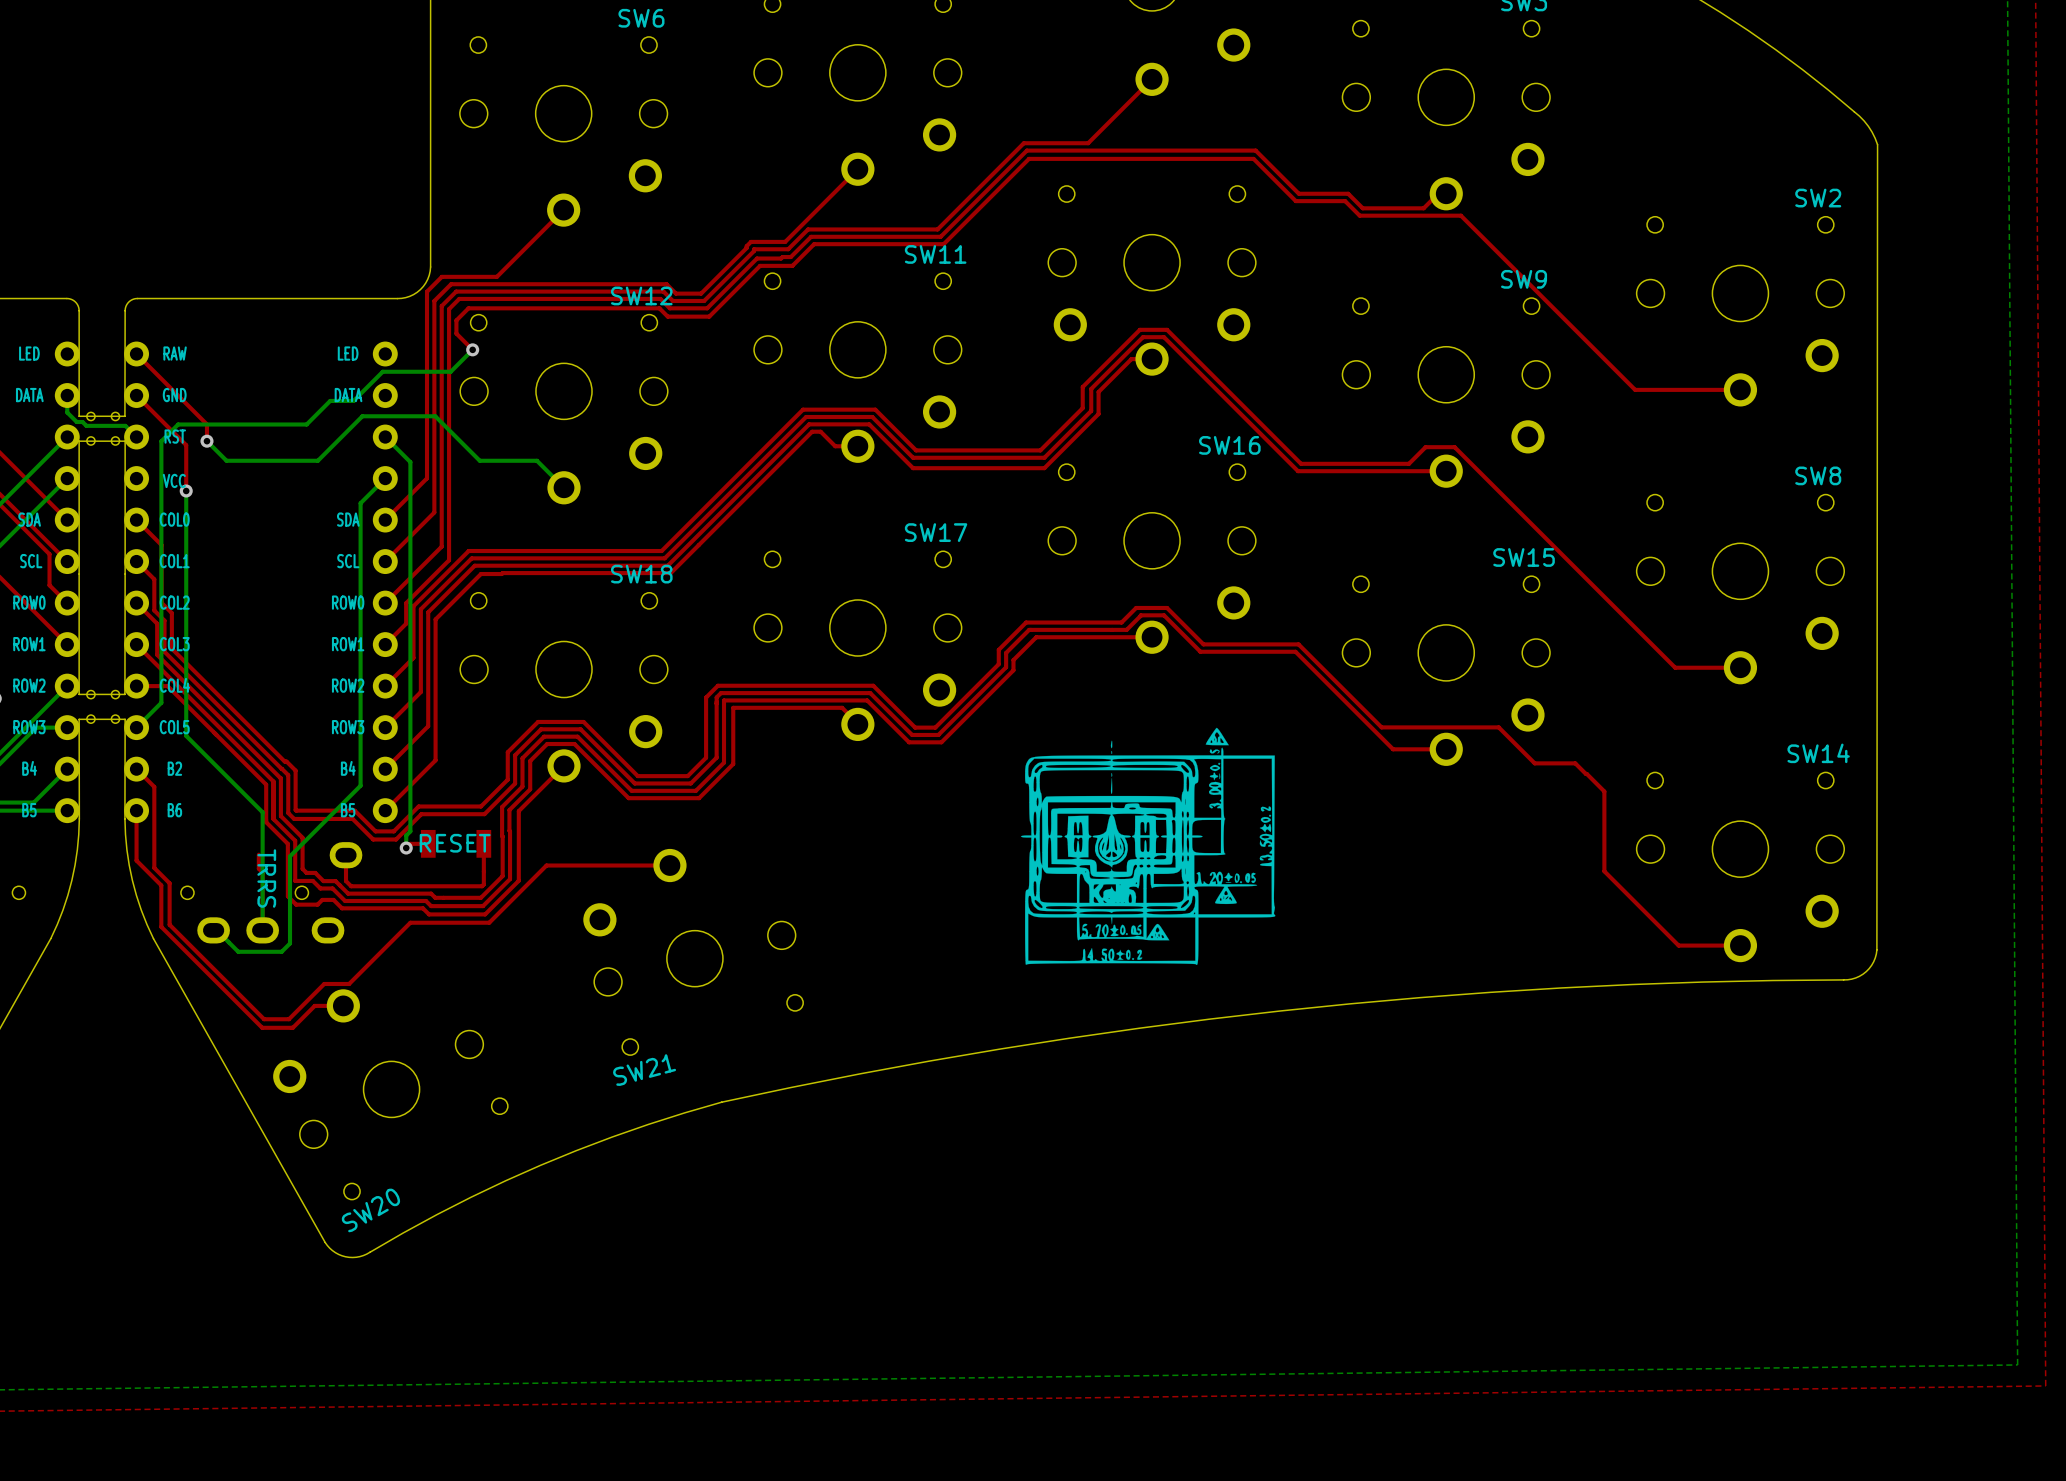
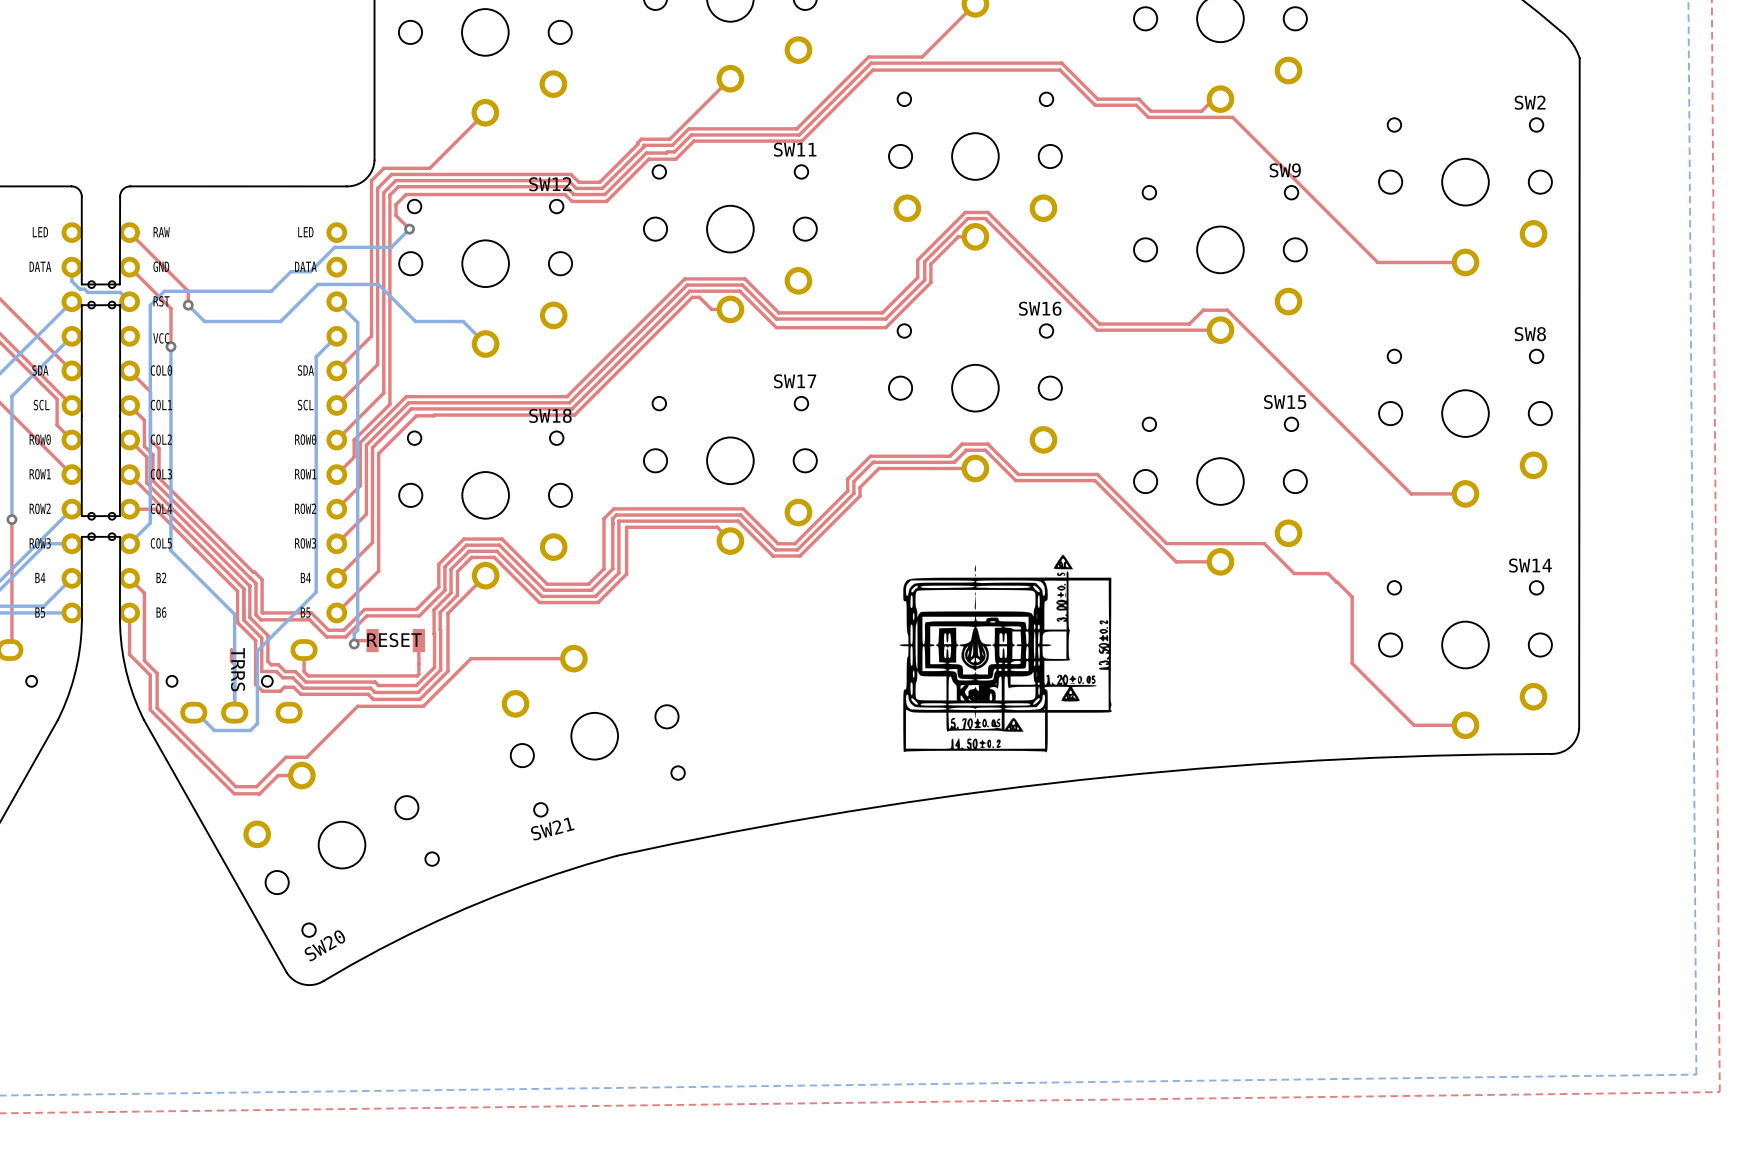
drawing position: (1148, 846) -> (1005, 653)

